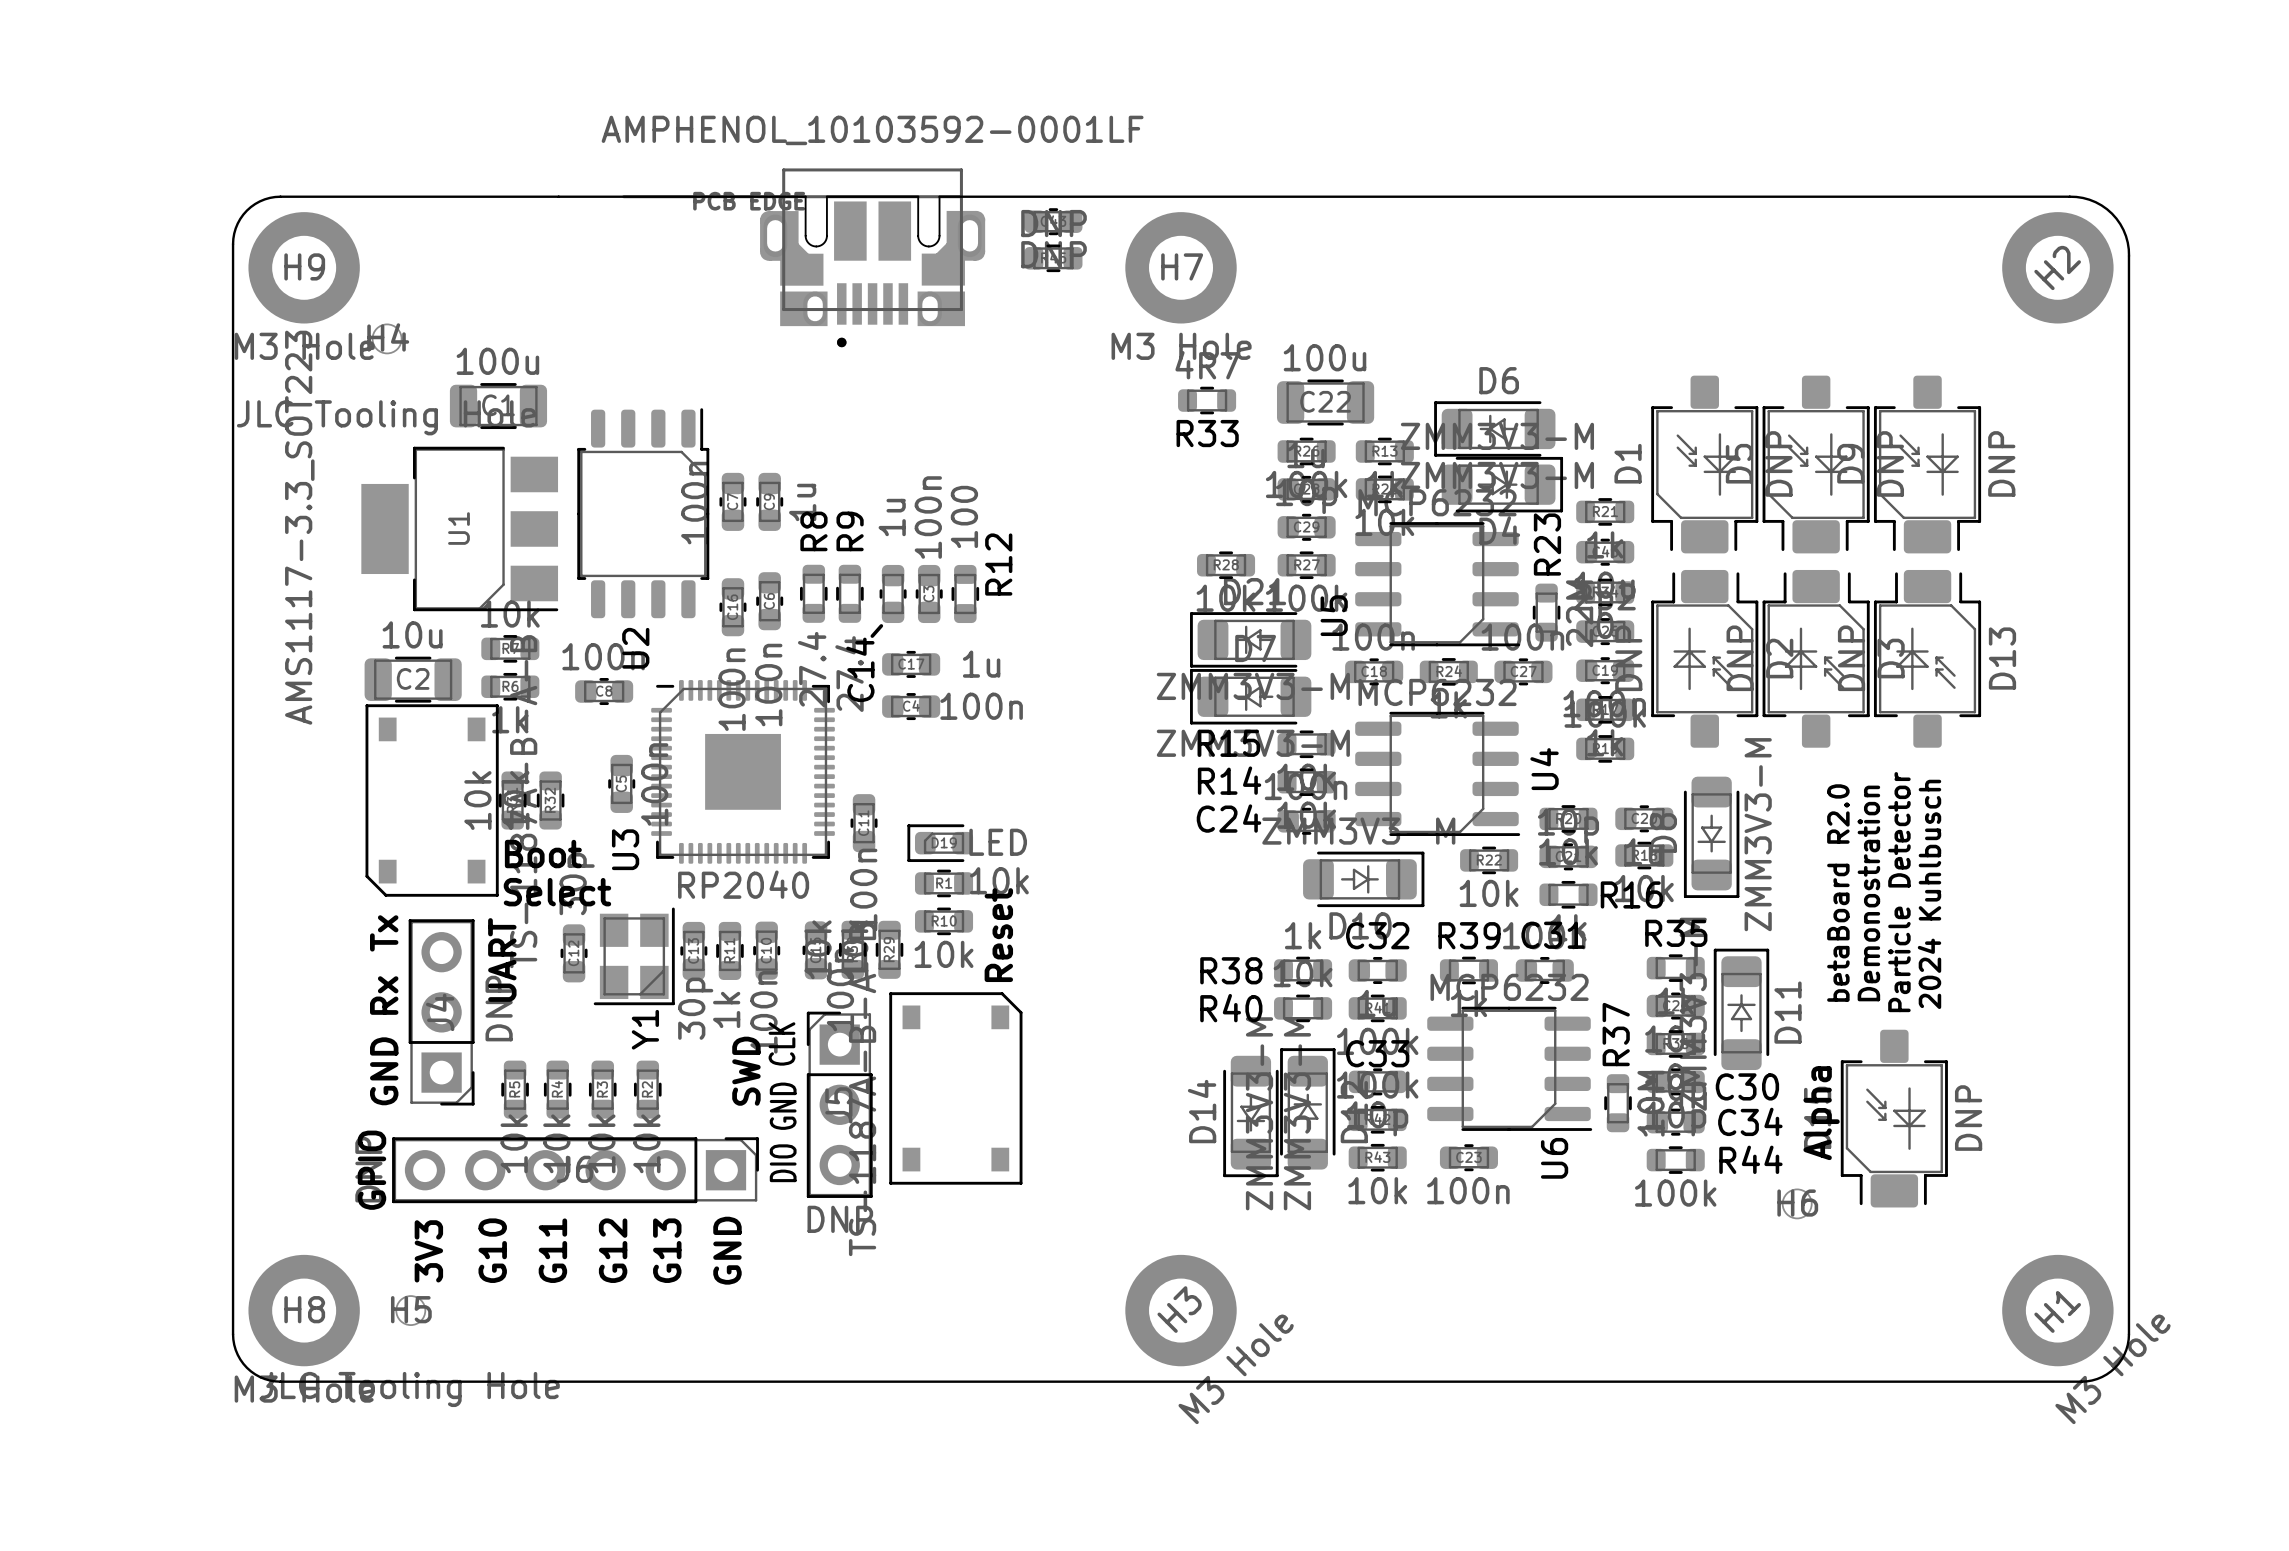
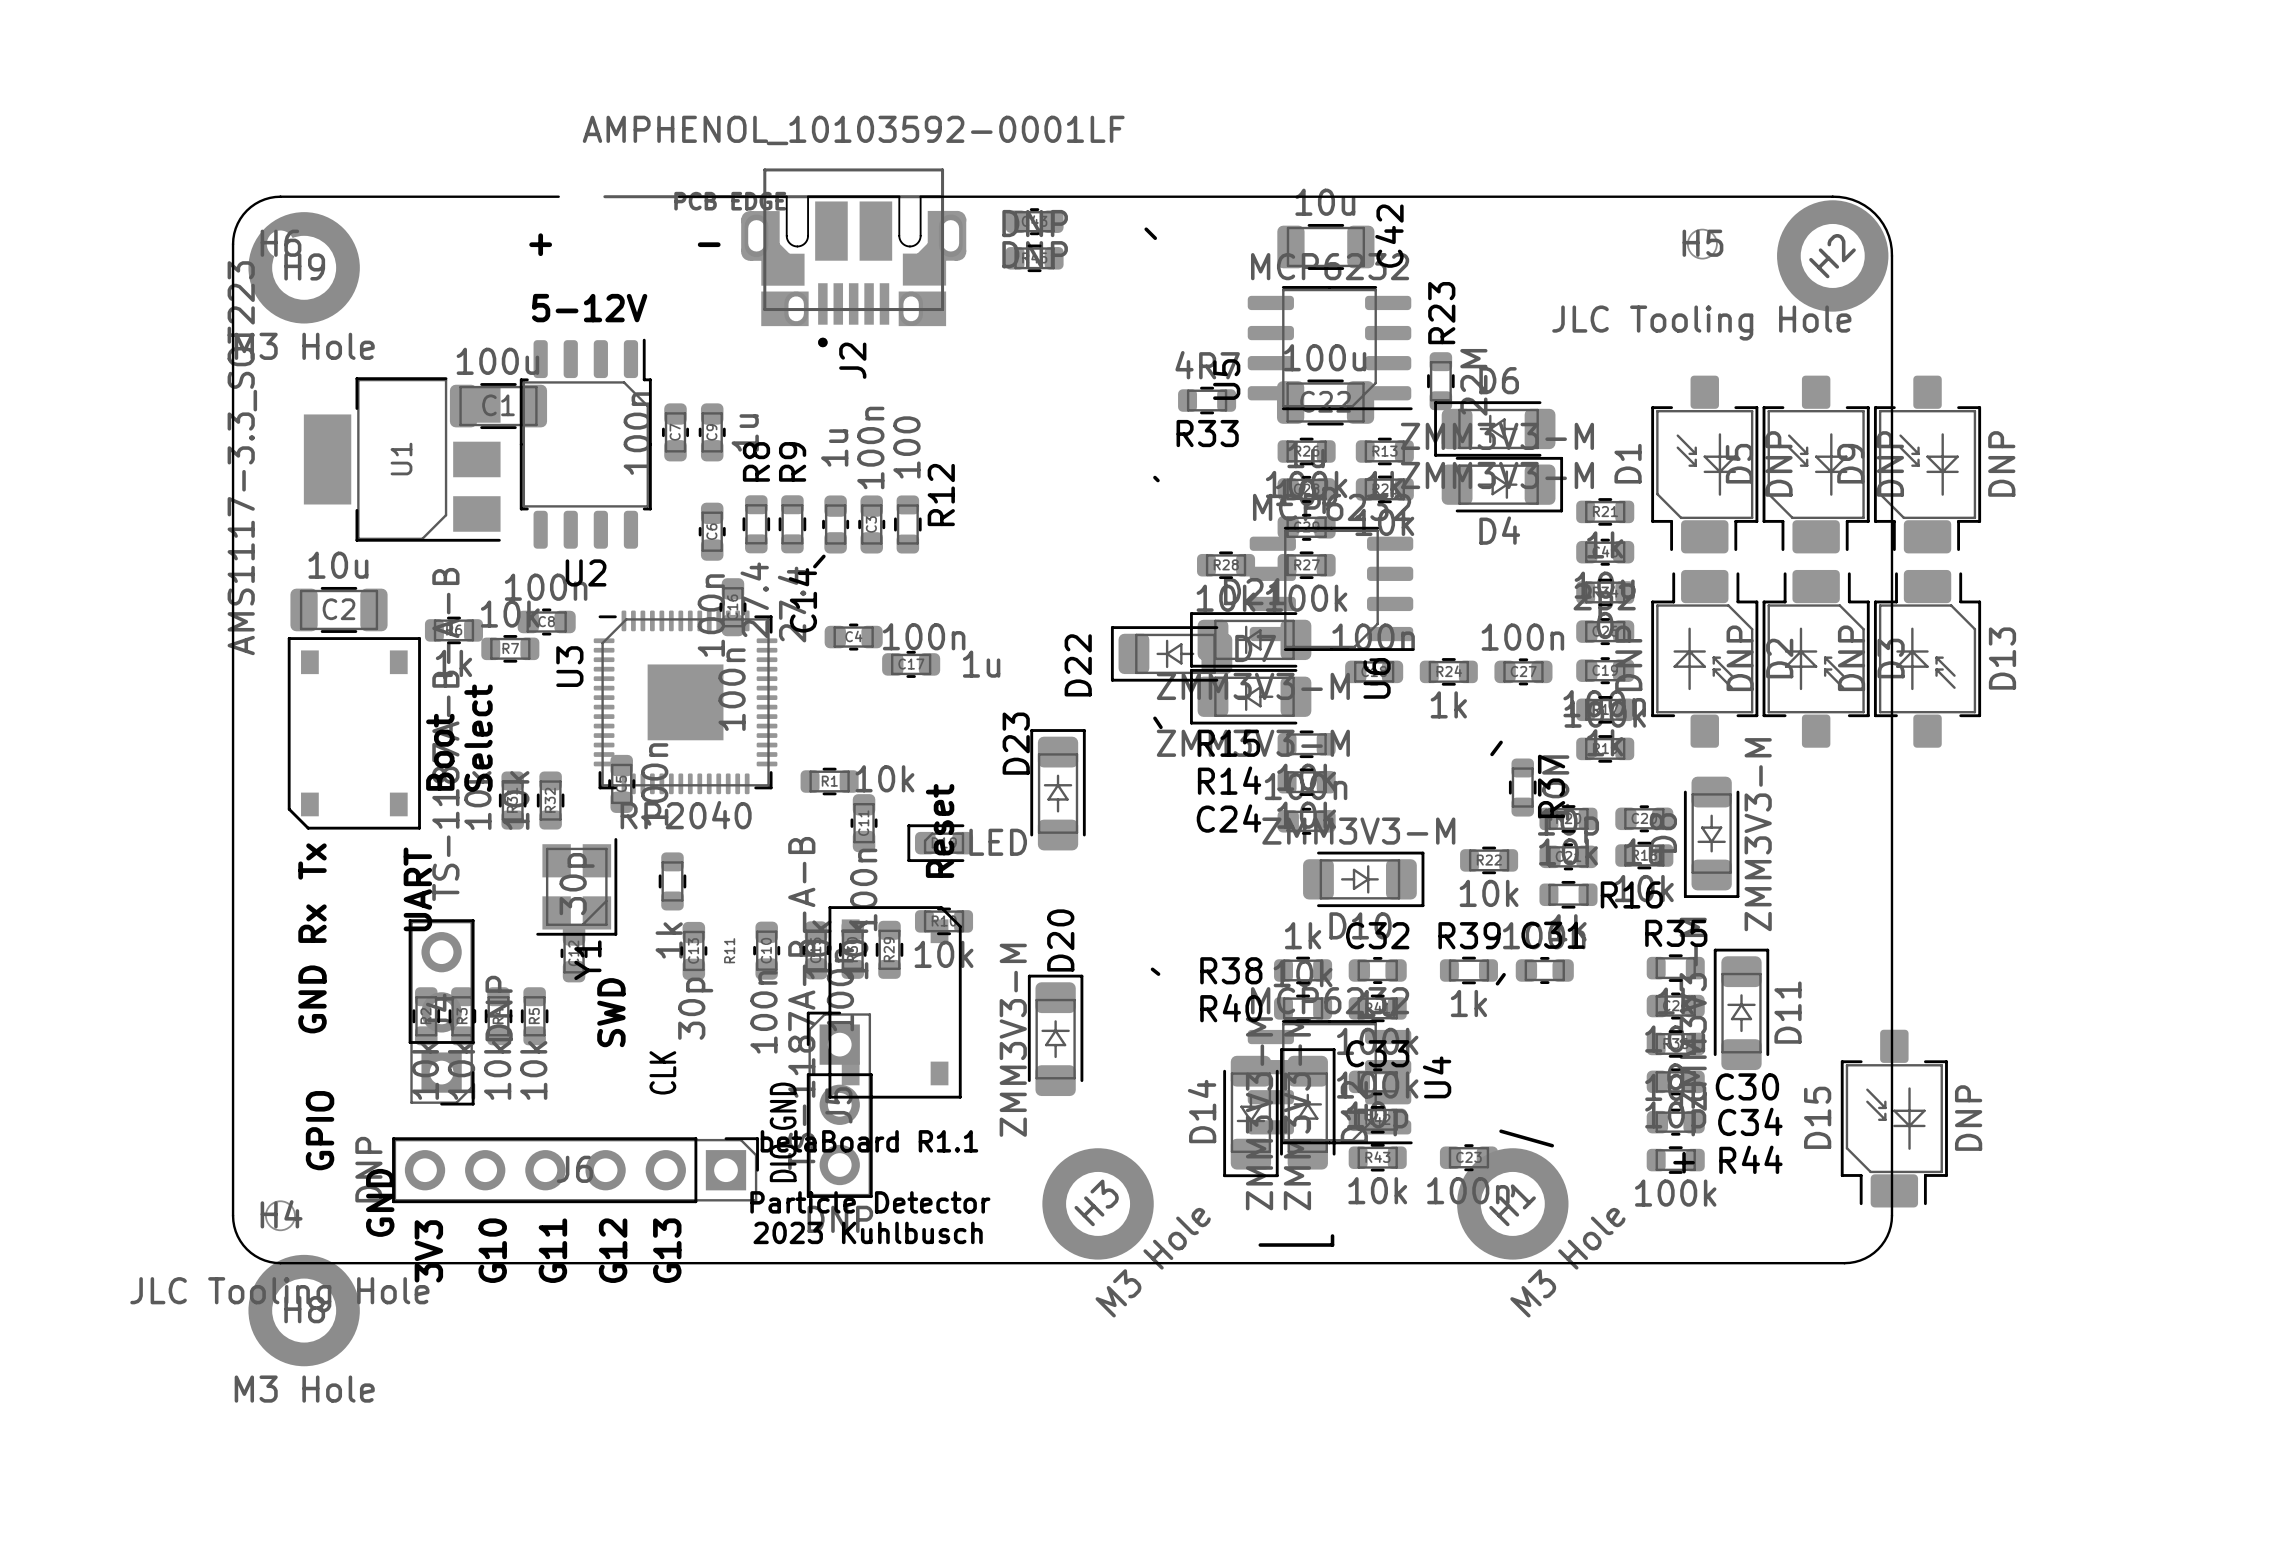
board edge: (558, 196) (679, 196) -> none
board edge: (786, 196) (805, 196) -> (808, 196) (826, 196)
board edge: (899, 196) (918, 196) -> (920, 196) (939, 196)
board edge: (1832, 196) (2083, 197) (2101, 205) (2112, 213) (2123, 230) (2127, 242) (2128, 1334) (2124, 1354) (2118, 1363) (2106, 1374) (2097, 1379) (2081, 1381) (275, 1381) (259, 1376) (246, 1367) (237, 1354) (234, 1344) (233, 1215) -> (1832, 196) (1846, 197) (1858, 202) (1875, 213) (1886, 230) (1890, 242) (1891, 255) (1891, 1215) (1887, 1236) (1881, 1245) (1869, 1255) (1855, 1261) (1844, 1263) (280, 1263) (259, 1258) (246, 1249) (237, 1236) (233, 1215)
part position: (1053, 221) -> (1034, 221)
line: none -> (1146, 229) (1155, 238)
text: none -> + (540, 244)
text: none -> - (709, 244)
C42: none -> 10u (1325, 246)
J2 position: (803, 257) -> (784, 257)
part position: (1053, 258) -> (1034, 258)
H7: M3 Hole (1181, 267) -> none
H2 position: (2057, 267) -> (1832, 255)
text: none -> 5-12V (589, 308)
H4 position: (387, 338) -> (280, 1215)
J2 name: none -> J2 (852, 360)
line: none -> (1154, 477) (1157, 480)
C7 position: (732, 501) -> (675, 432)
C9 position: (769, 501) -> (712, 432)
U2 position: (643, 513) -> (585, 443)
U1 position: (459, 528) -> (402, 459)
U5 position: (1437, 584) -> (1330, 348)
R8 position: (813, 593) -> (756, 524)
R9 position: (849, 593) -> (792, 524)
C14 position: (893, 593) -> (835, 524)
C3 position: (929, 593) -> (871, 524)
R12 position: (965, 593) -> (907, 524)
C6 position: (769, 601) -> (712, 531)
R23 position: (1546, 612) -> (1440, 381)
line: (881, 625) (872, 636) -> (823, 556) (814, 566)
U2 name rotation: 0° (635, 648) -> 90° clockwise (586, 572)
D22: none -> (1171, 653)
C2 position: (413, 679) -> (339, 609)
R6 position: (510, 686) -> (453, 630)
C8 position: (604, 691) -> (546, 621)
C4 position: (911, 706) -> (853, 637)
line: none -> (1154, 718) (1160, 727)
line: none -> (1501, 742) (1492, 754)
U3 position: (743, 771) -> (685, 702)
U4 position: (1437, 773) -> (1330, 1082)
D23: none -> (1058, 789)
part position: (432, 800) -> (354, 733)
U3 name position: U3 (625, 849) -> U3 (569, 666)
text rotation: 0° (543, 854) -> 90° counterclockwise (440, 752)
text position: Boot (543, 854) -> Boot (440, 752)
R1 position: (944, 883) -> (829, 781)
text rotation: 0° (557, 892) -> 90° counterclockwise (478, 738)
text position: Select (557, 892) -> Select (478, 738)
text: Particle Detector (1899, 892) -> none
text: betaBoard R2.0 (1838, 893) -> none
text: Demonostration (1868, 893) -> none
text: 2024 Kuhlbusch (1929, 894) -> none
text position: Tx (384, 933) -> Tx (312, 861)
text position: Reset (998, 935) -> Reset (940, 830)
R11 position: (729, 950) -> (672, 881)
Y1 position: (634, 956) -> (576, 886)
text position: UART (502, 959) -> UART (417, 889)
line: none -> (1152, 969) (1158, 974)
line: none -> (1504, 974) (1497, 983)
text position: Rx (384, 995) -> Rx (312, 923)
text: none -> GND (312, 999)
R37 name position: R37 (1616, 1034) -> R37 (1551, 786)
D20: none -> ZMM3V3-M (1055, 1035)
text position: CLK (781, 1043) -> CLK (662, 1072)
U6 position: (1509, 1068) -> (1332, 588)
text: GND (384, 1071) -> none
text position: SWD (746, 1071) -> SWD (611, 1012)
part position: (955, 1088) -> (895, 1002)
R5 position: (515, 1089) -> (534, 1016)
R4 position: (557, 1089) -> (498, 1016)
R3 position: (602, 1089) -> (462, 1016)
R2 position: (647, 1089) -> (426, 1016)
R37 position: (1618, 1103) -> (1522, 787)
text: Alpha (1821, 1113) -> none
line: none -> (1501, 1131) (1552, 1145)
text: none -> betaBoard R1.1 (869, 1141)
text: none -> + (1684, 1162)
text position: GPIO (371, 1170) -> GPIO (320, 1130)
text: none -> GND (380, 1202)
text: none -> Particle Detector (870, 1202)
H6 position: (1797, 1203) -> (280, 244)
text: none -> 2023 Kuhlbusch (868, 1232)
line: none -> (1332, 1235) (1332, 1245) (1260, 1245)
text: GND (727, 1250) -> none
H5 position: (410, 1310) -> (1702, 244)
H3 position: (1181, 1310) -> (1098, 1203)
H1 position: (2057, 1310) -> (1512, 1203)

